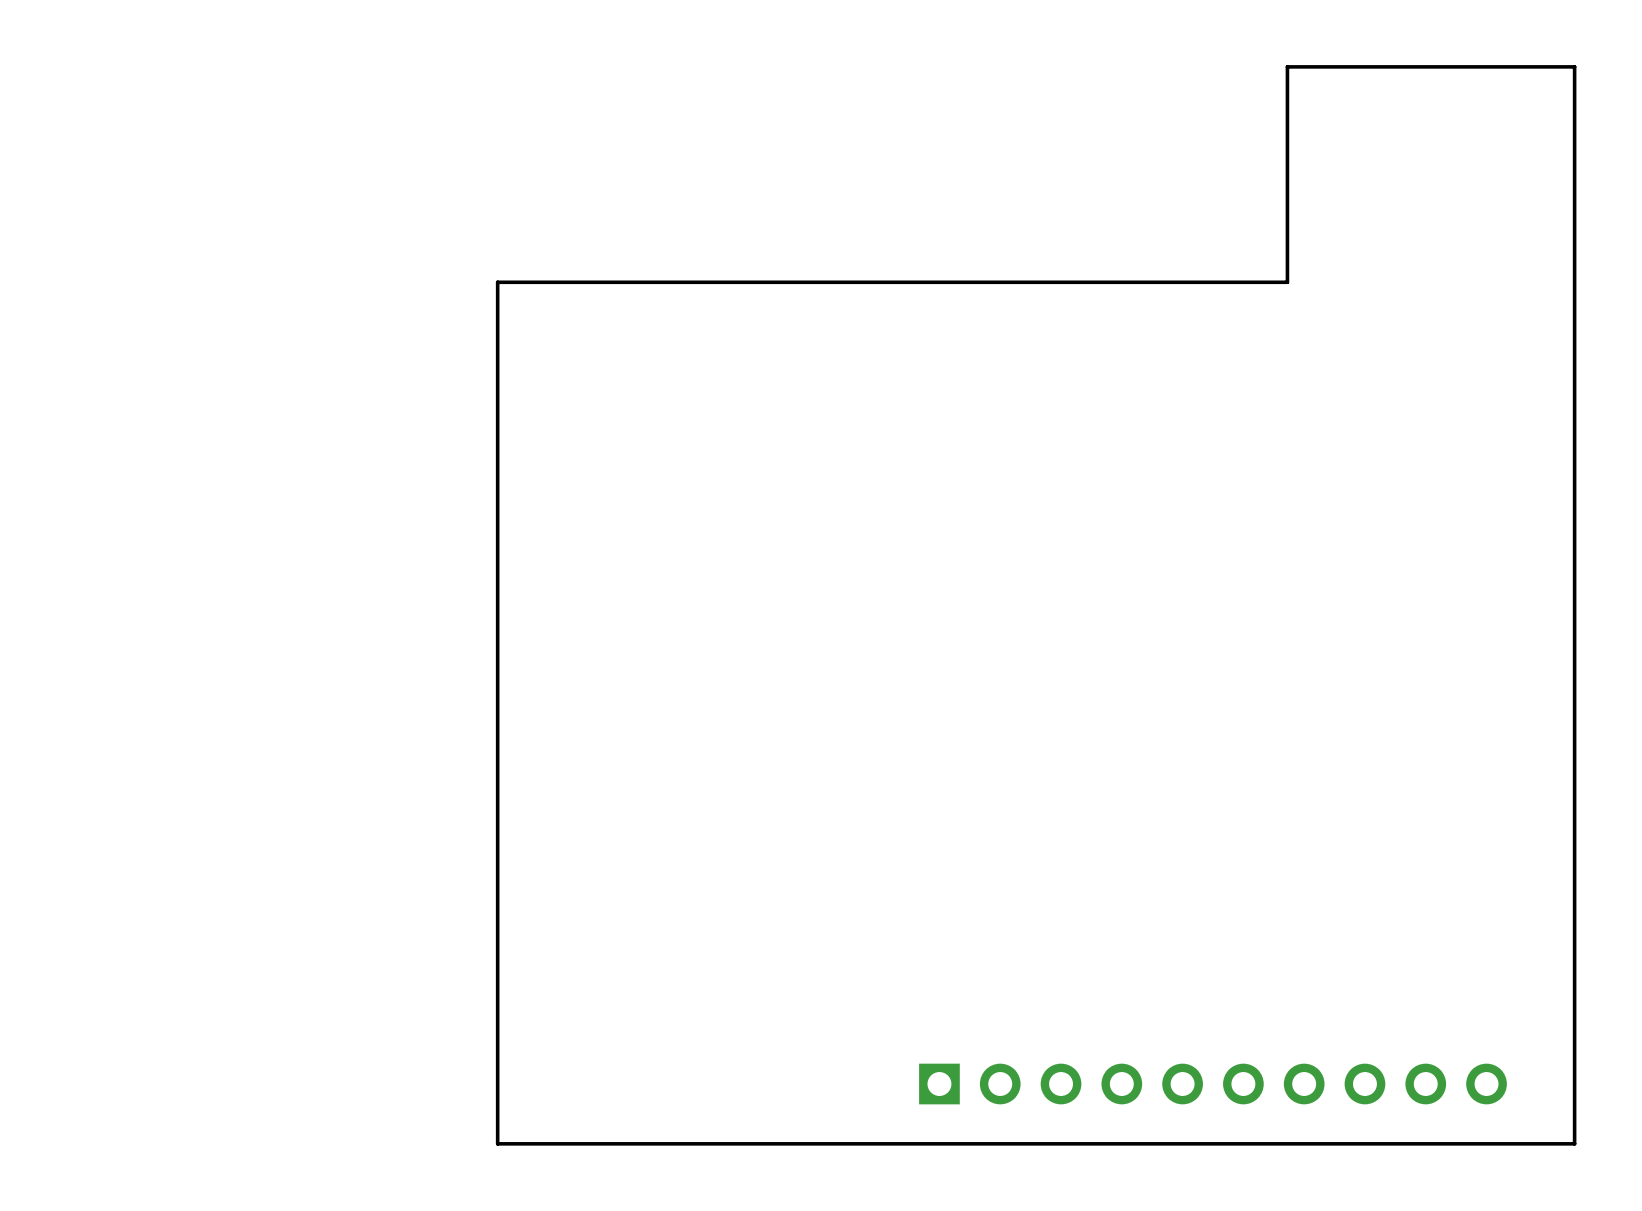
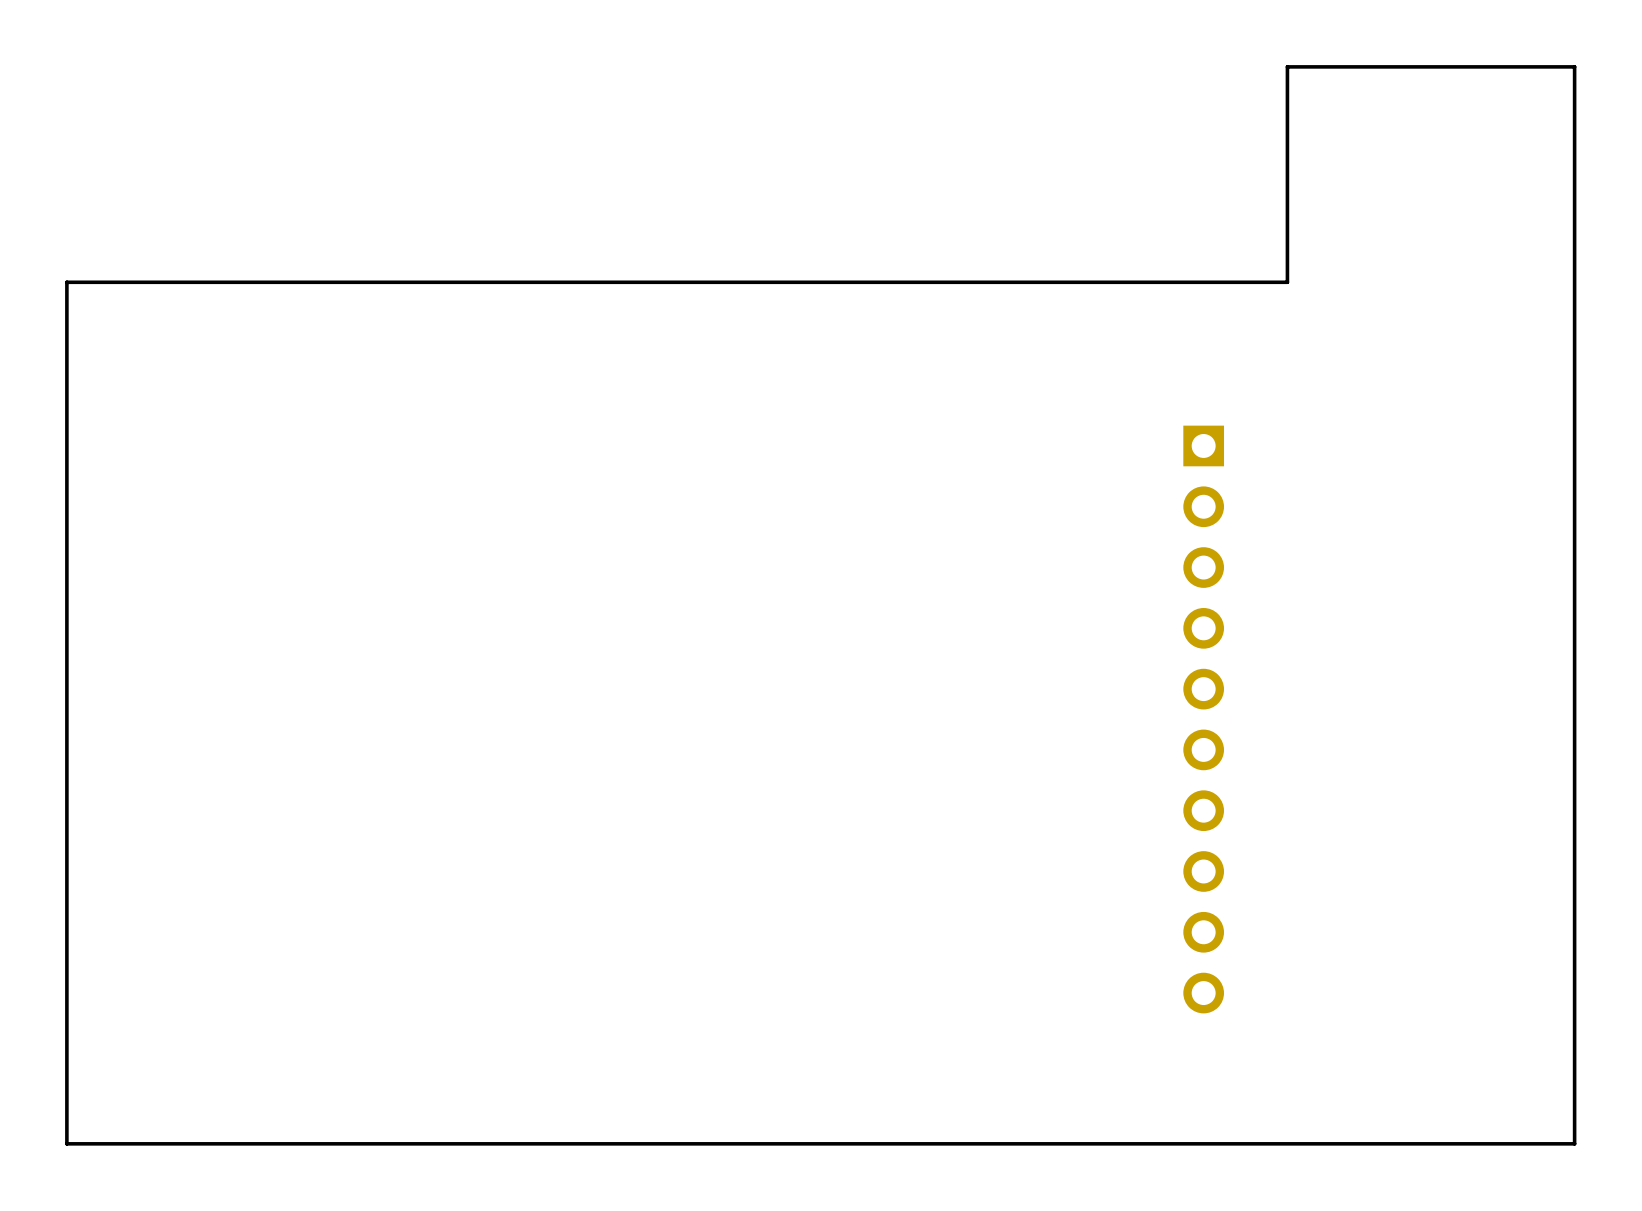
board edge: (497, 282) (497, 1143) -> (497, 282) (66, 282) (66, 1143) (497, 1143)
part rotation: 0° (1213, 1084) -> 90° clockwise (1203, 719)
part position: (1213, 1084) -> (1203, 719)

